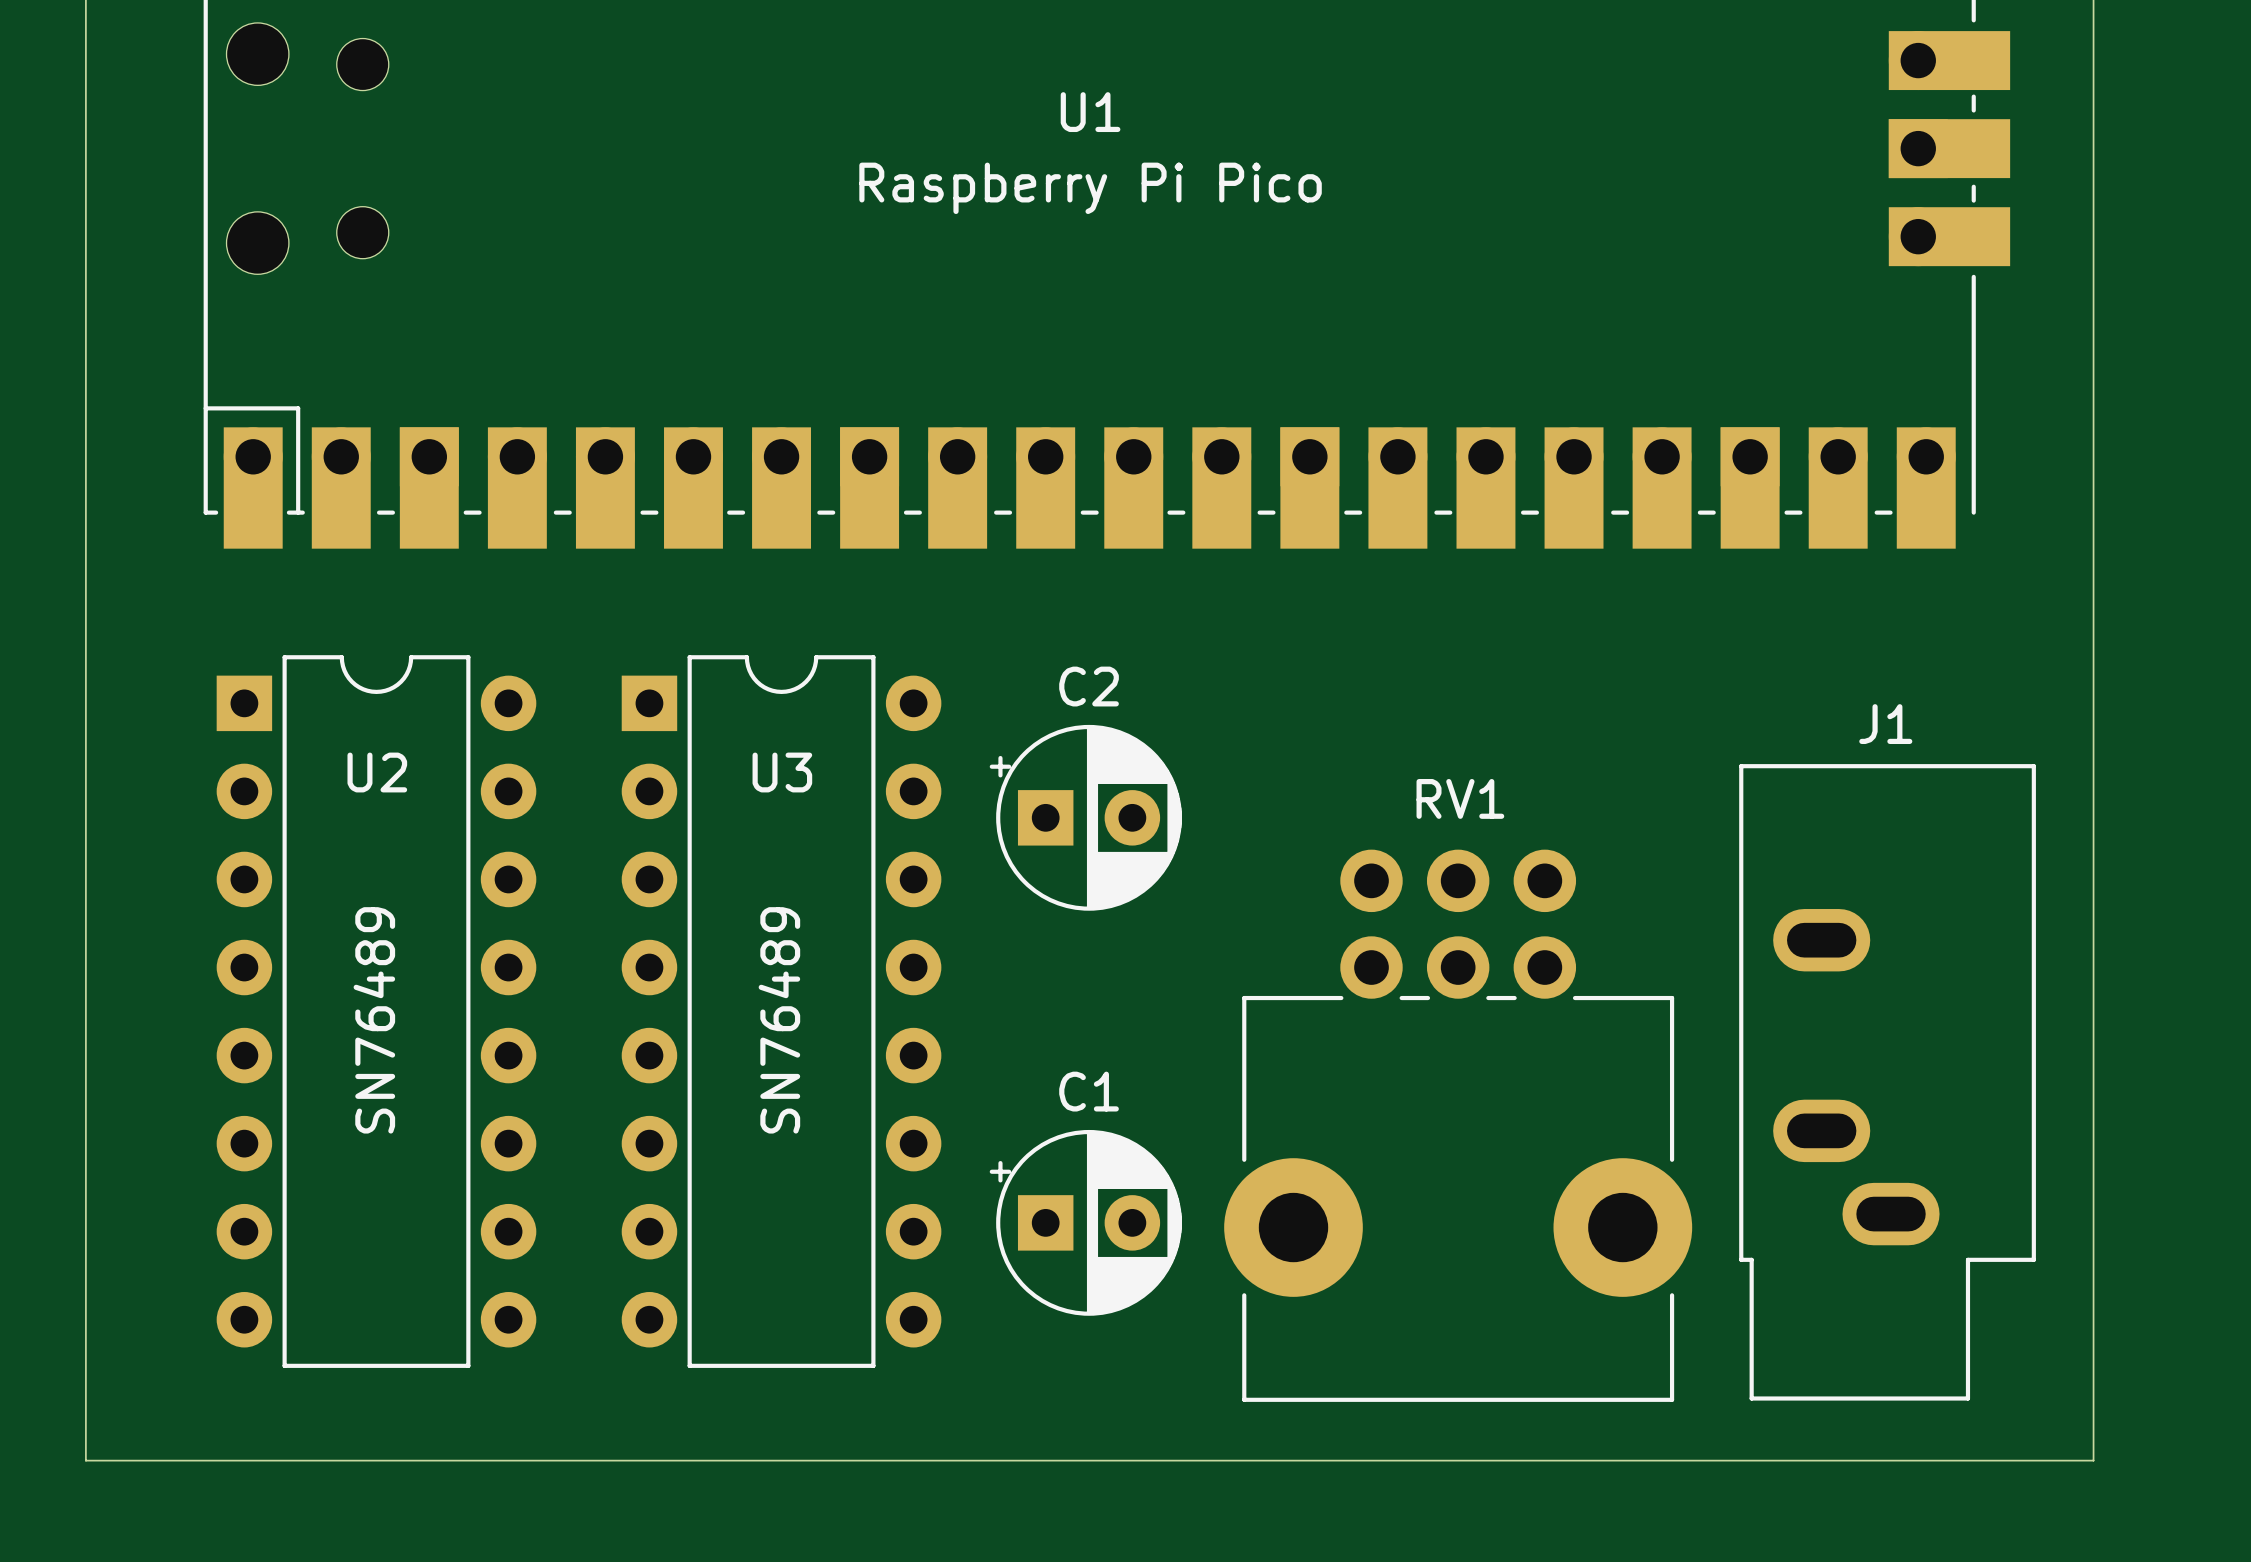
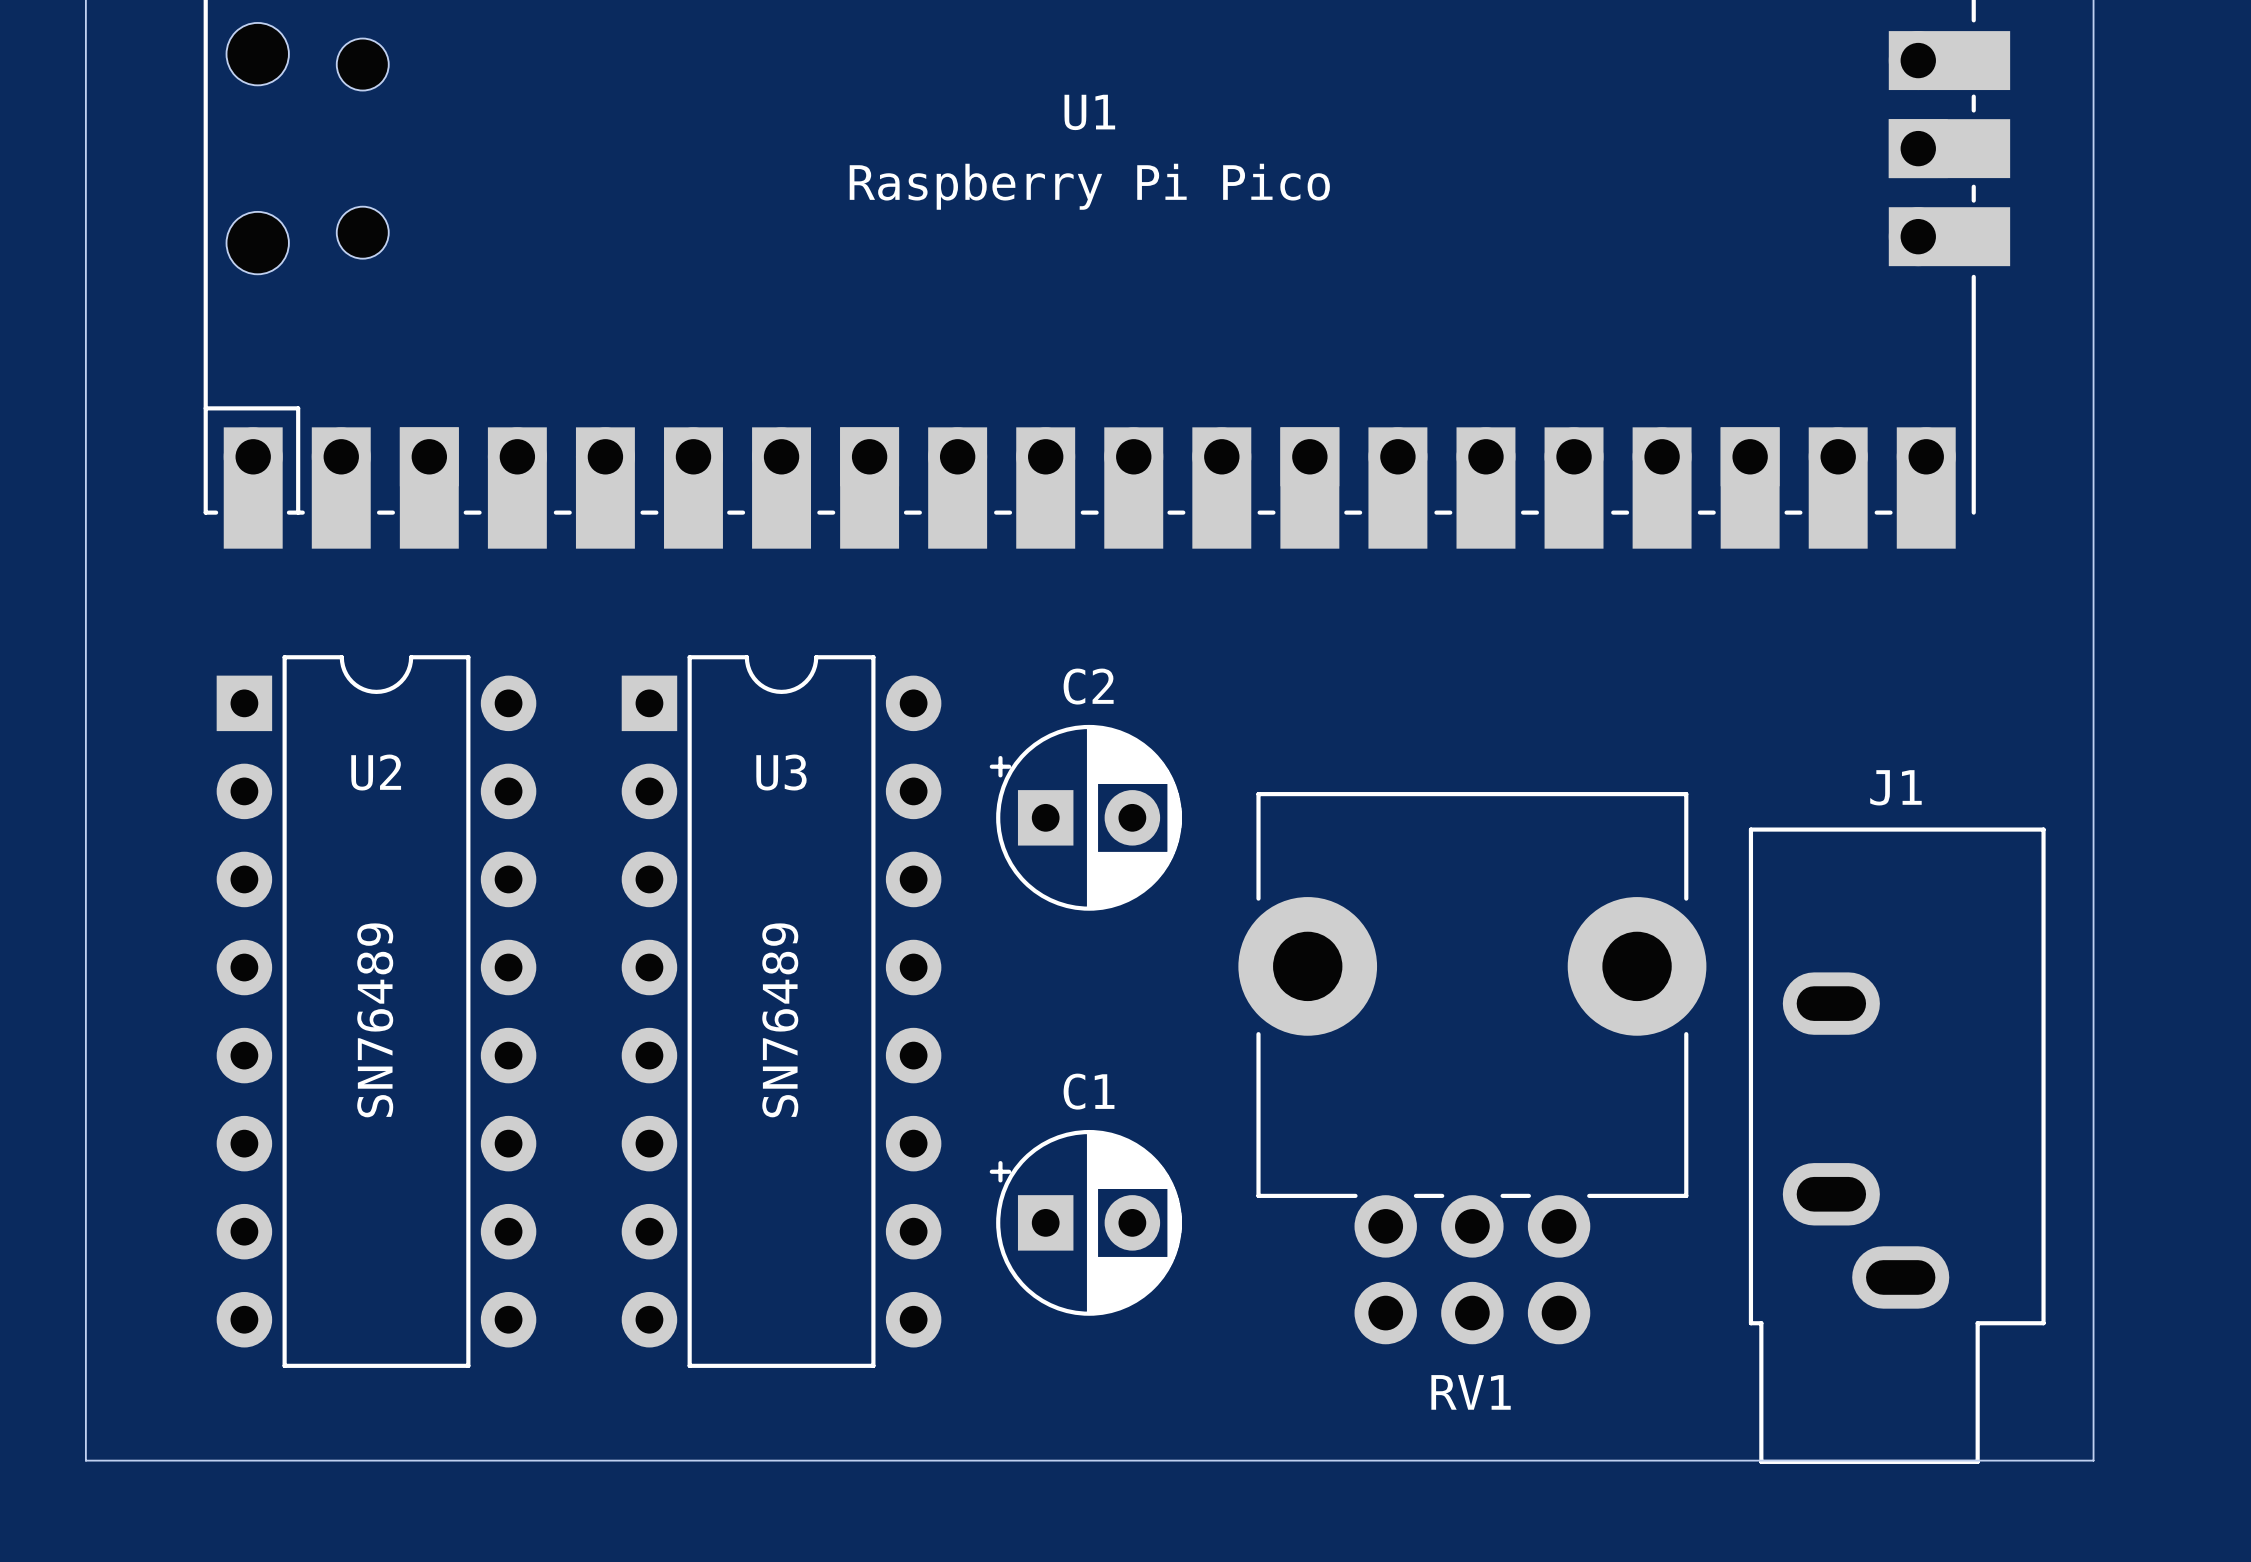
J1 position: (1887, 1082) -> (1897, 1145)
RV1 rotation: 0° (1458, 1125) -> 180° (1472, 1068)

